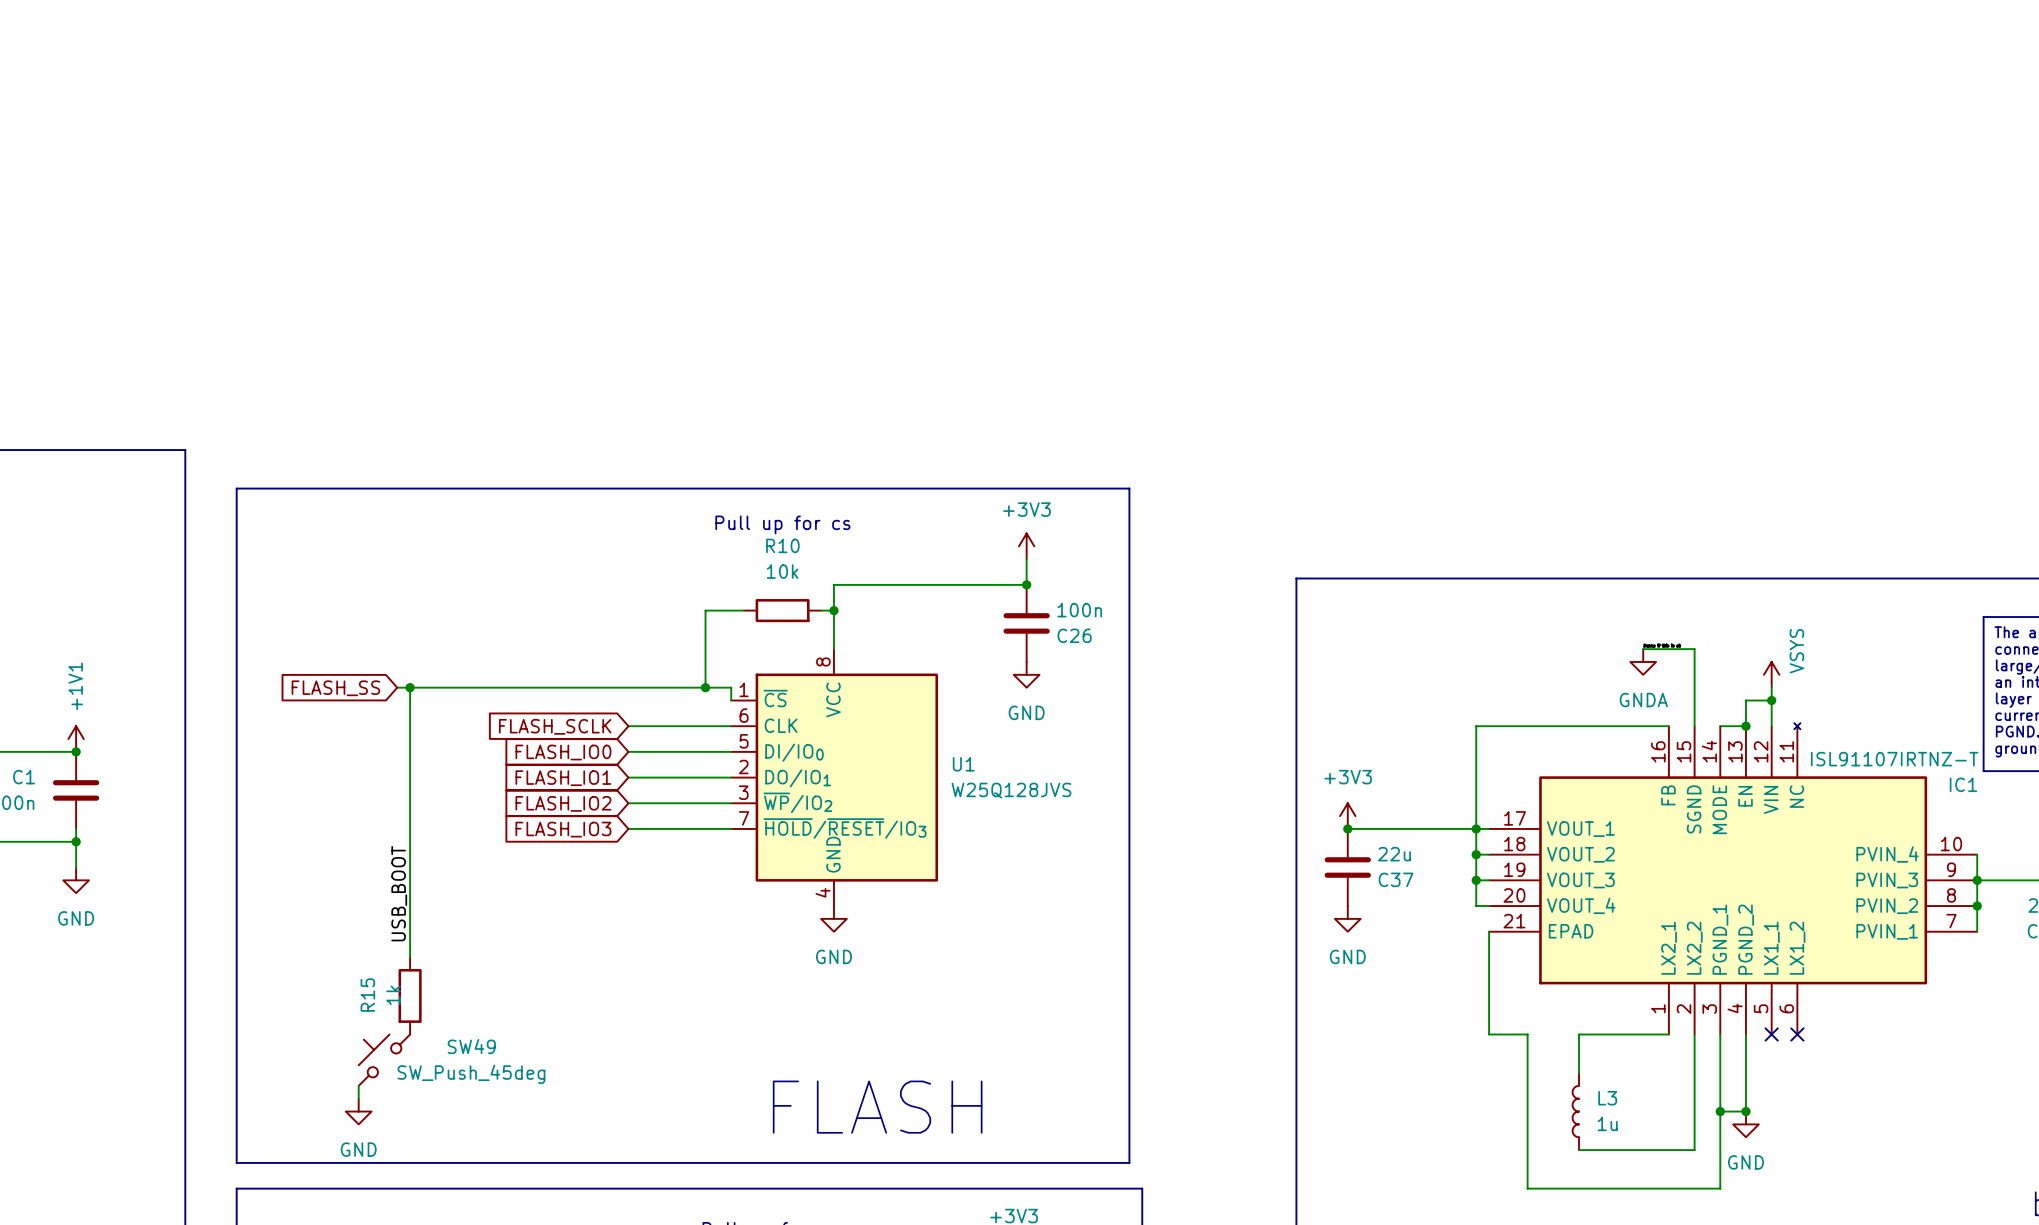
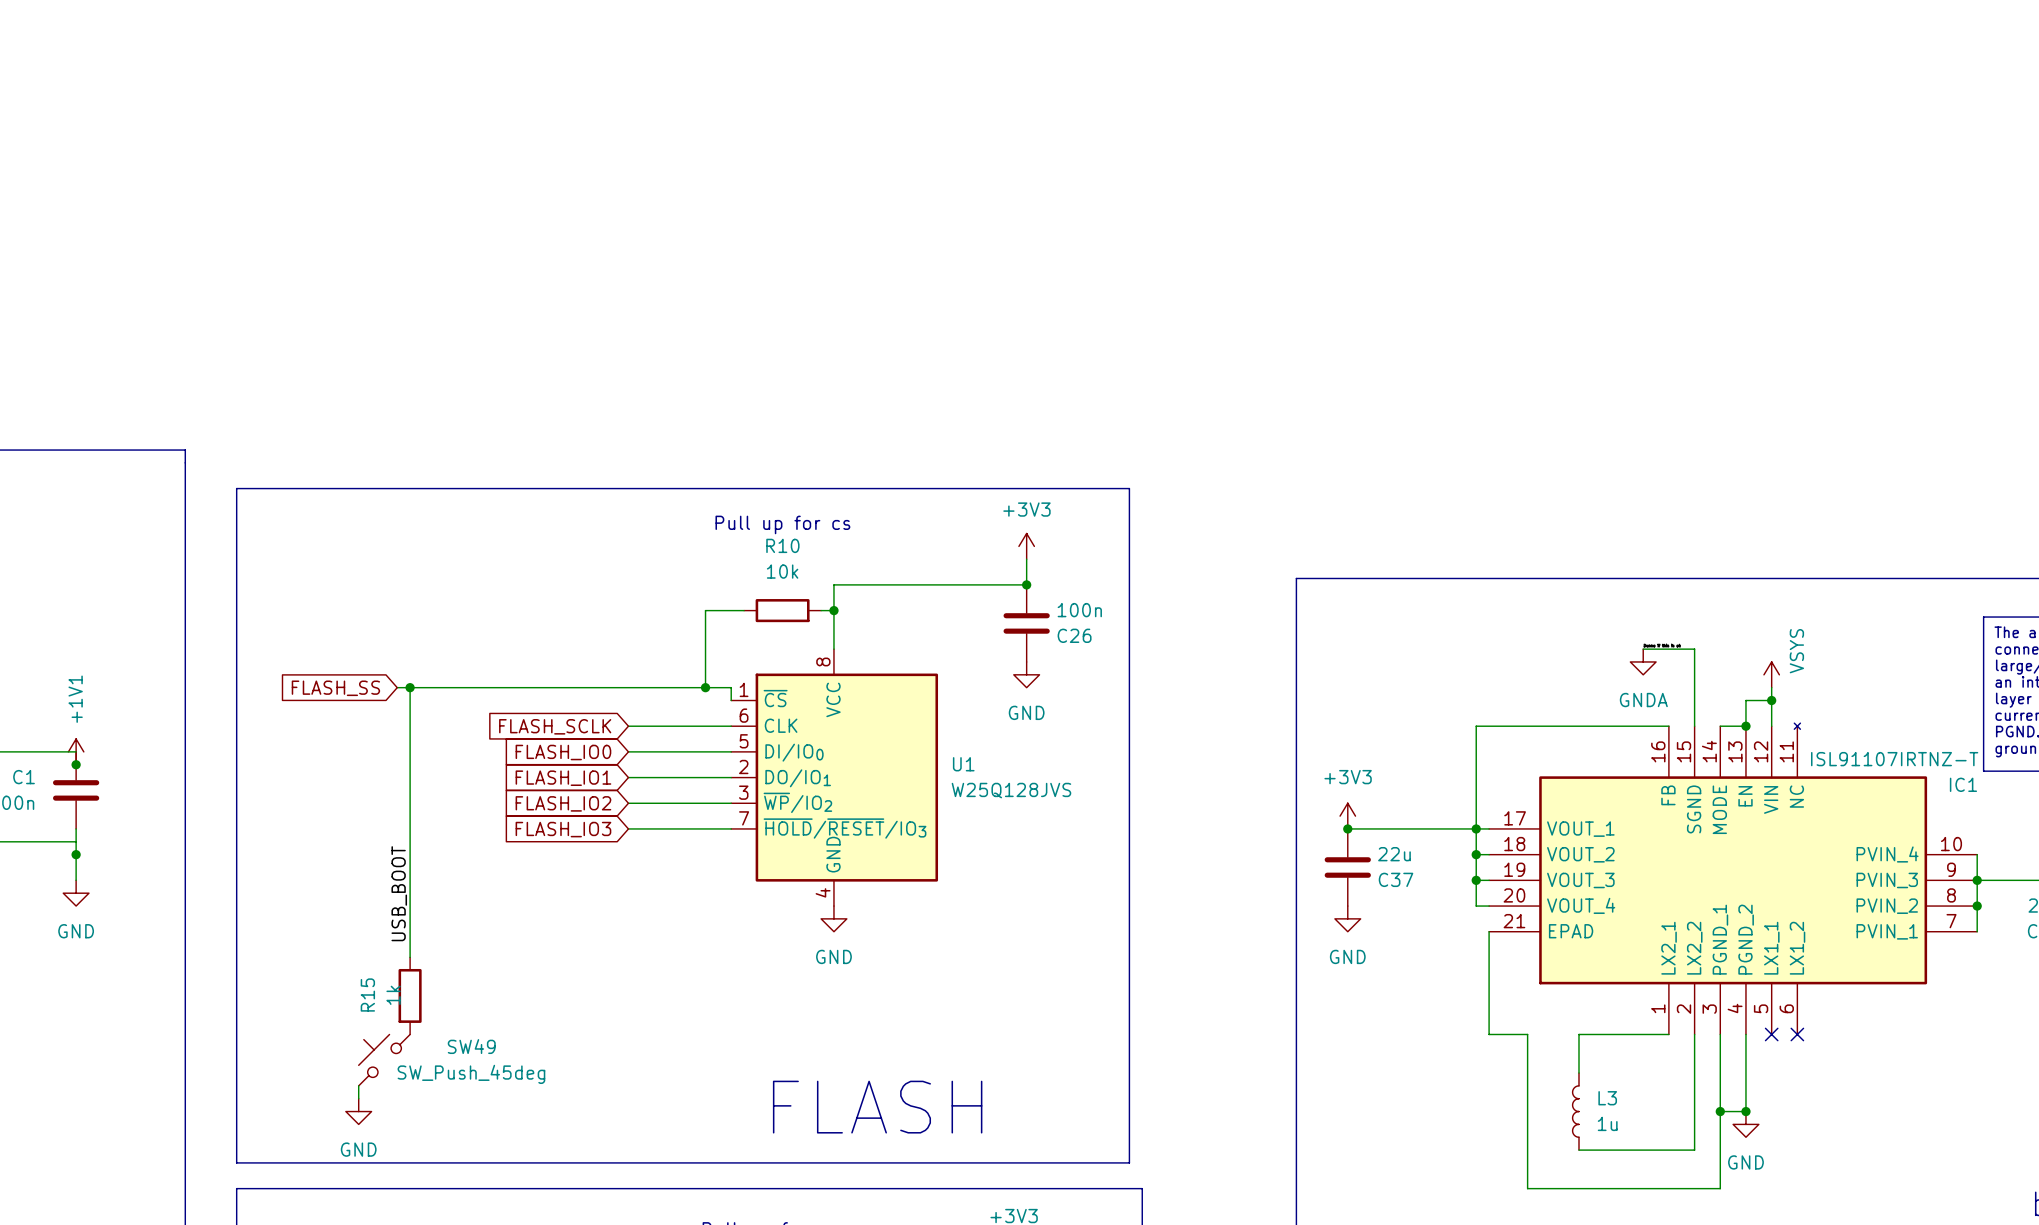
power symbol position: +1V1 (76, 739) -> +1V1 (76, 751)
junction position: (76, 751) -> (76, 764)
junction position: (76, 841) -> (76, 854)
power symbol position: GND (76, 880) -> GND (76, 893)

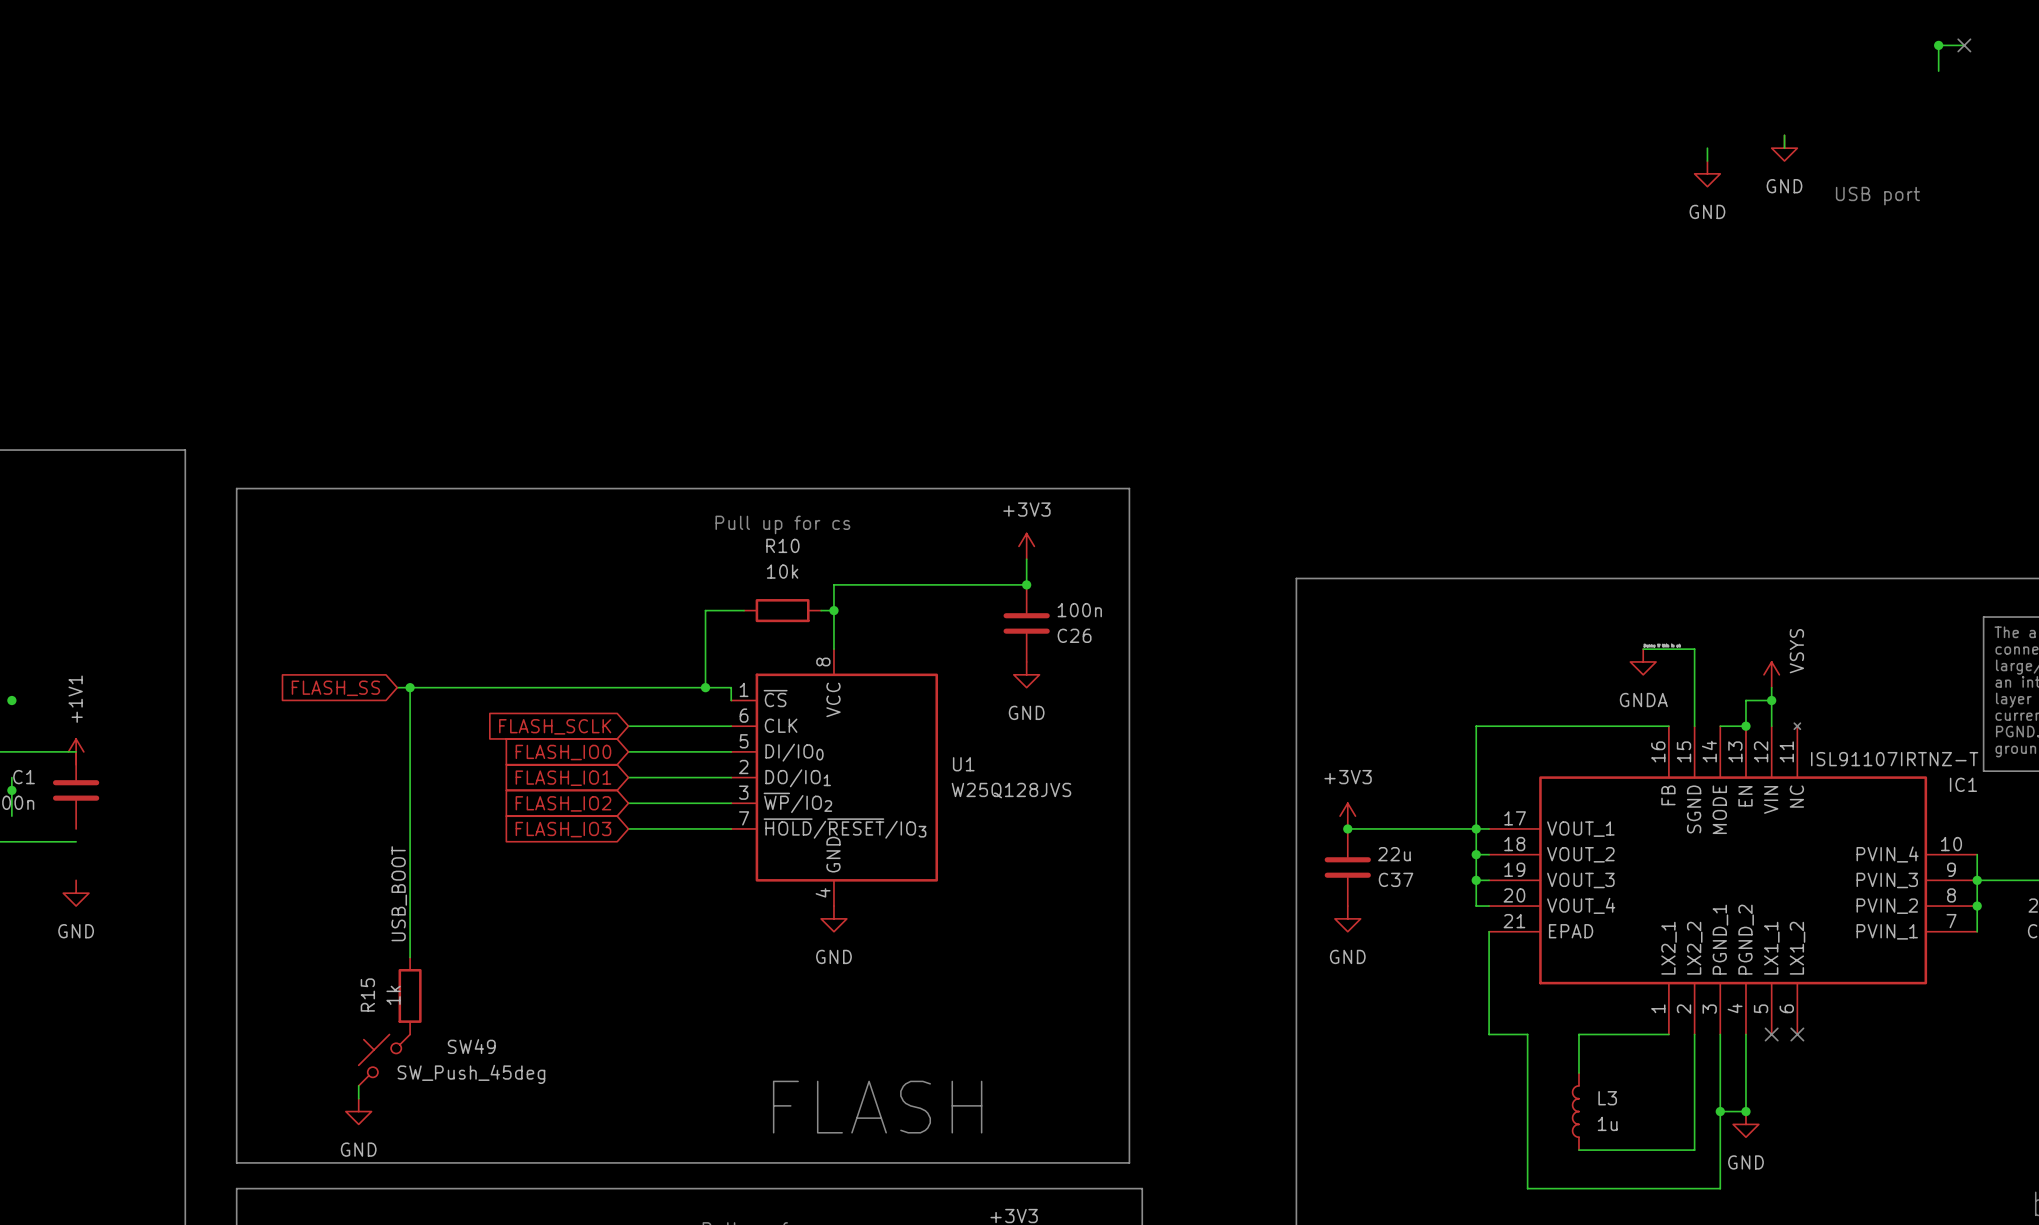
junction: none -> (1938, 45)
wire: none -> (1964, 45) (1938, 45) (1938, 71)
no-connect mark: none -> (1964, 45)
wire: none -> (1784, 135) (1784, 148)
wire: none -> (1707, 148) (1707, 161)
power symbol: none -> GND (1784, 148)
power symbol: none -> GND (1707, 173)
text: none -> USB port (1877, 196)
junction: none -> (11, 700)
junction: (76, 764) -> none
wire: none -> (11, 777) (11, 816)
junction: none -> (11, 790)
wire: (76, 828) (76, 880) -> none
junction: (76, 854) -> none

